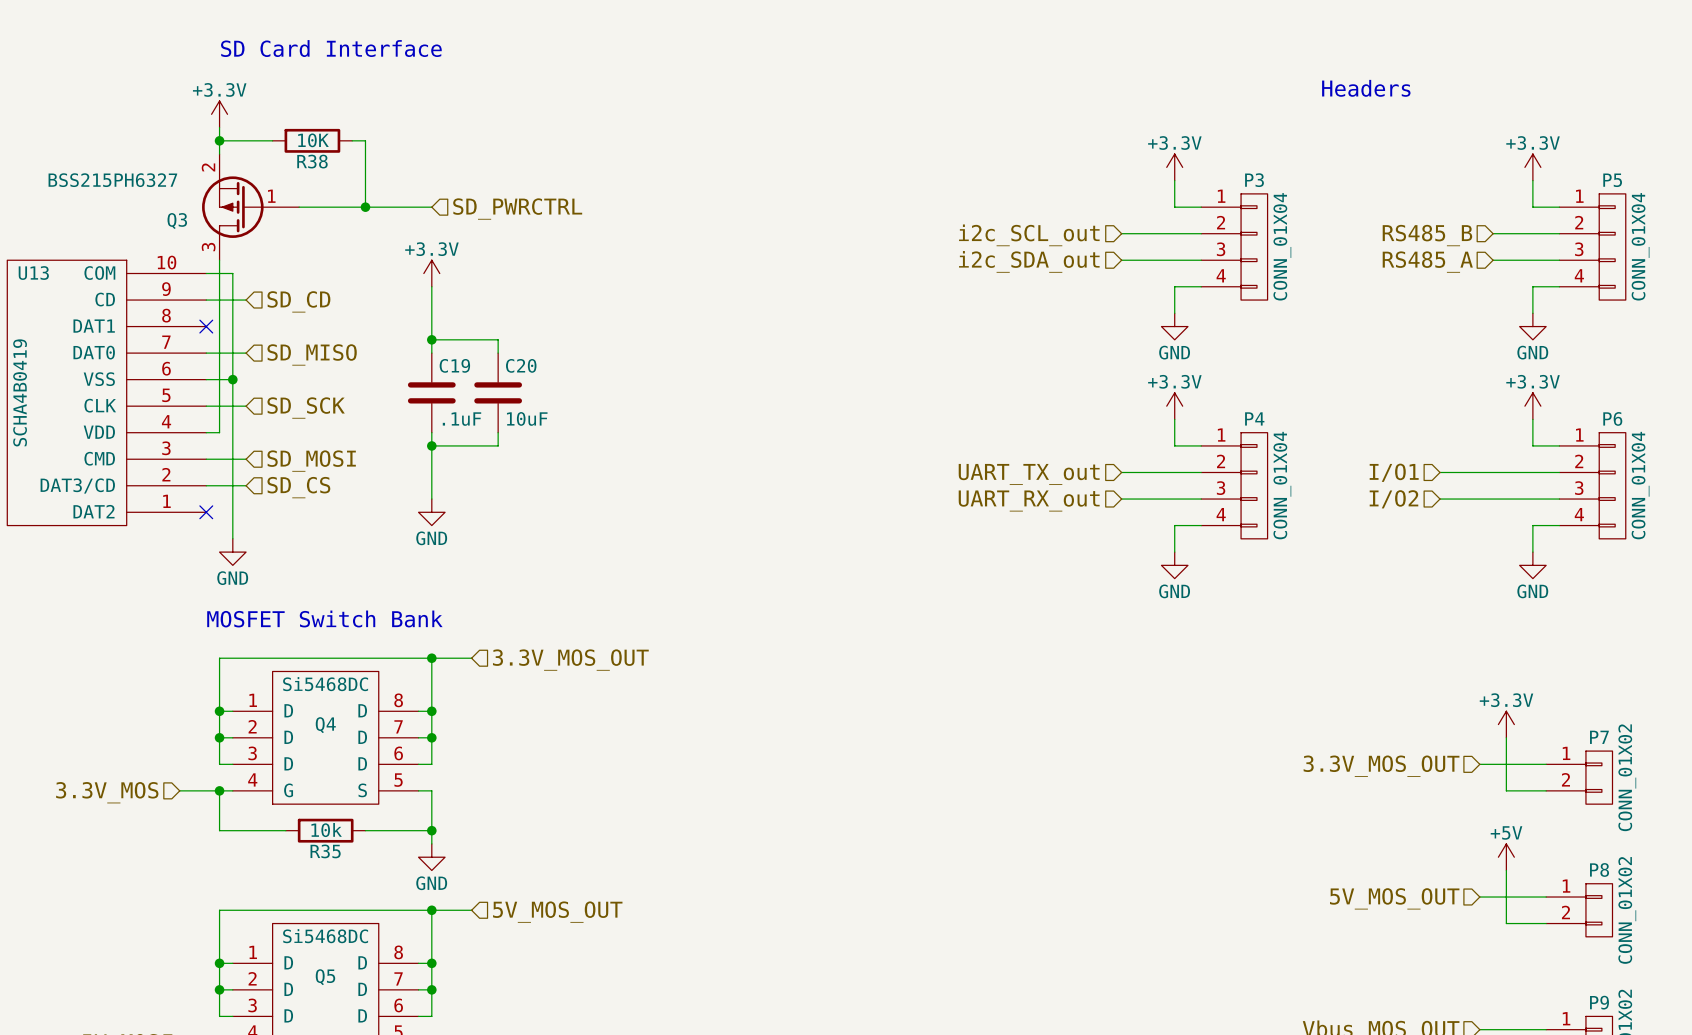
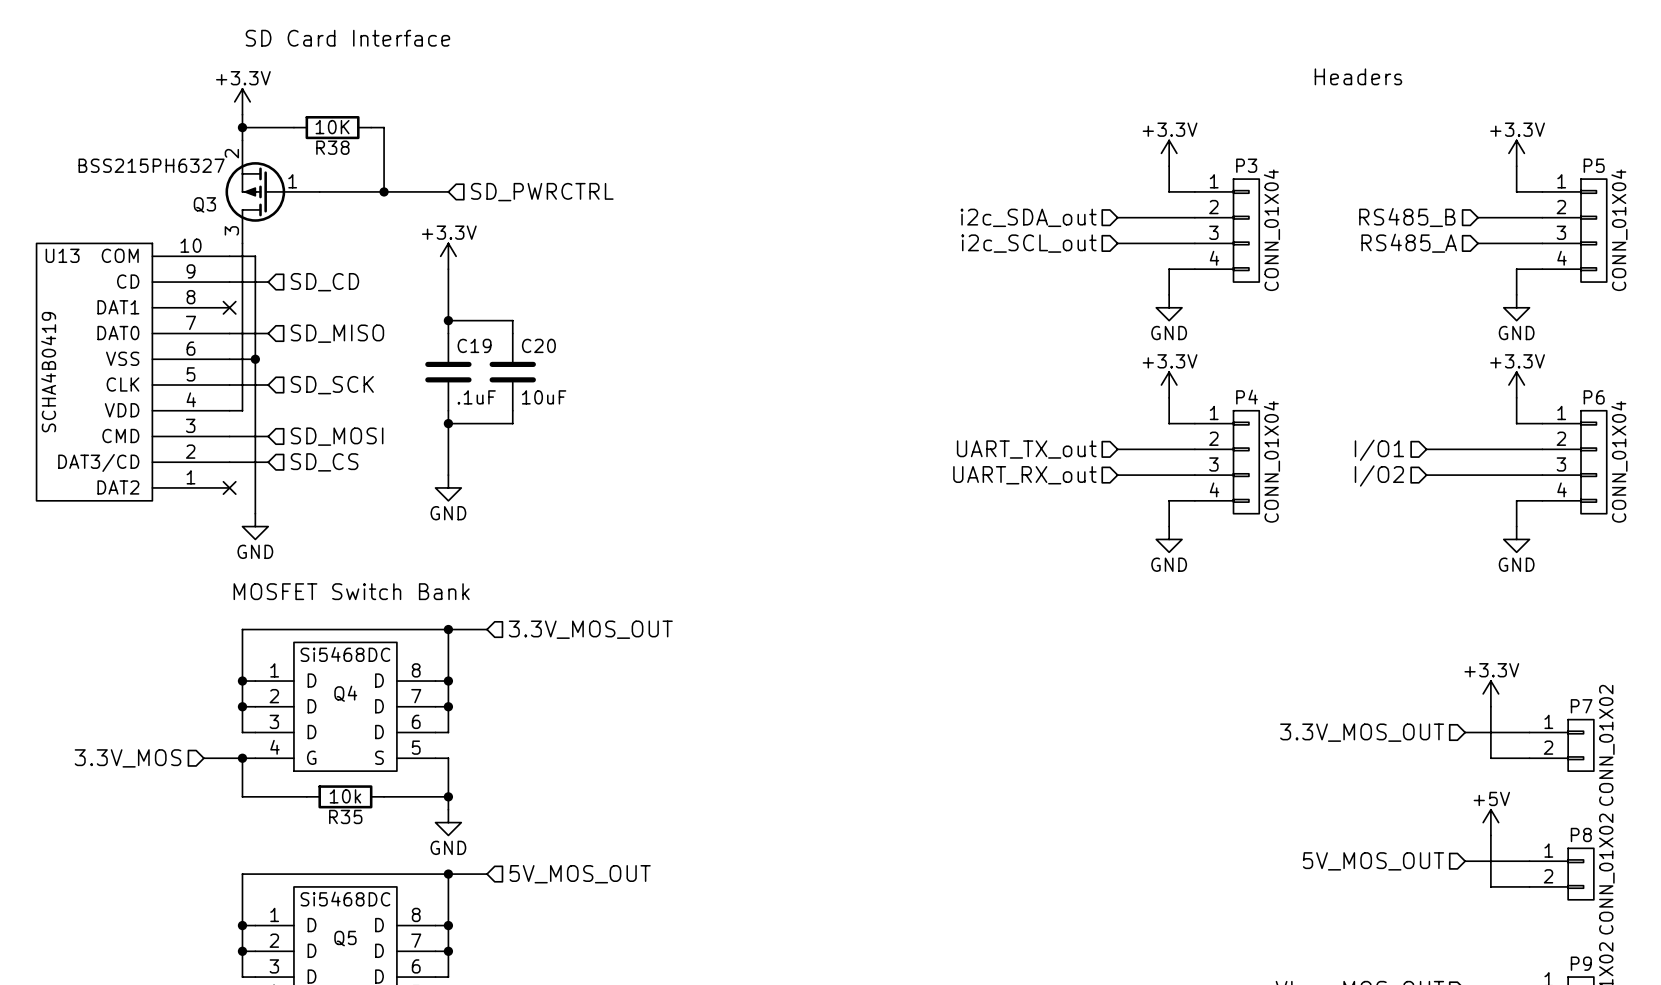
hierarchical label: i2c_SCL_out (1029, 235) -> i2c_SDA_out (1028, 217)
hierarchical label: i2c_SDA_out (1029, 261) -> i2c_SCL_out (1028, 243)

